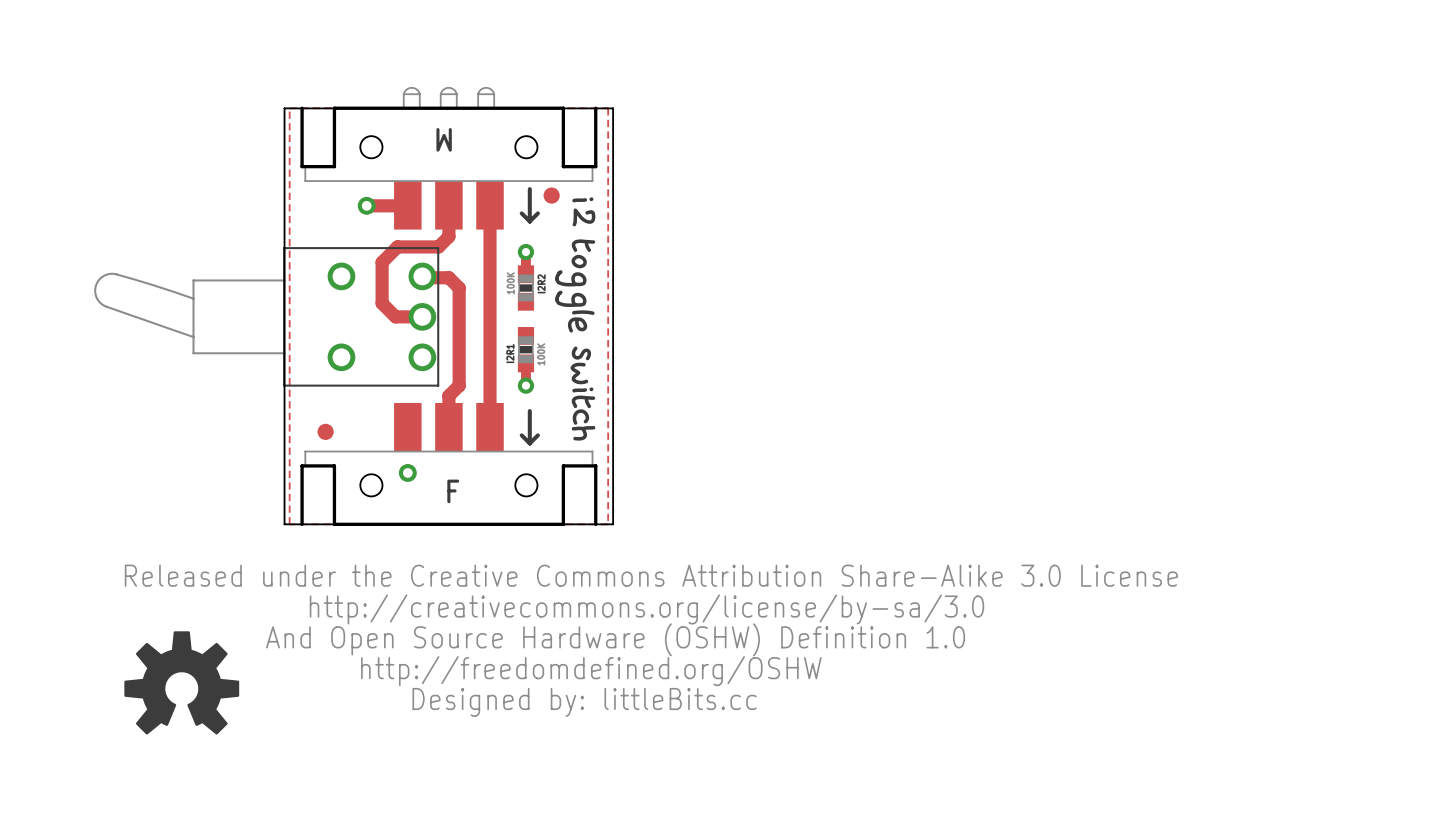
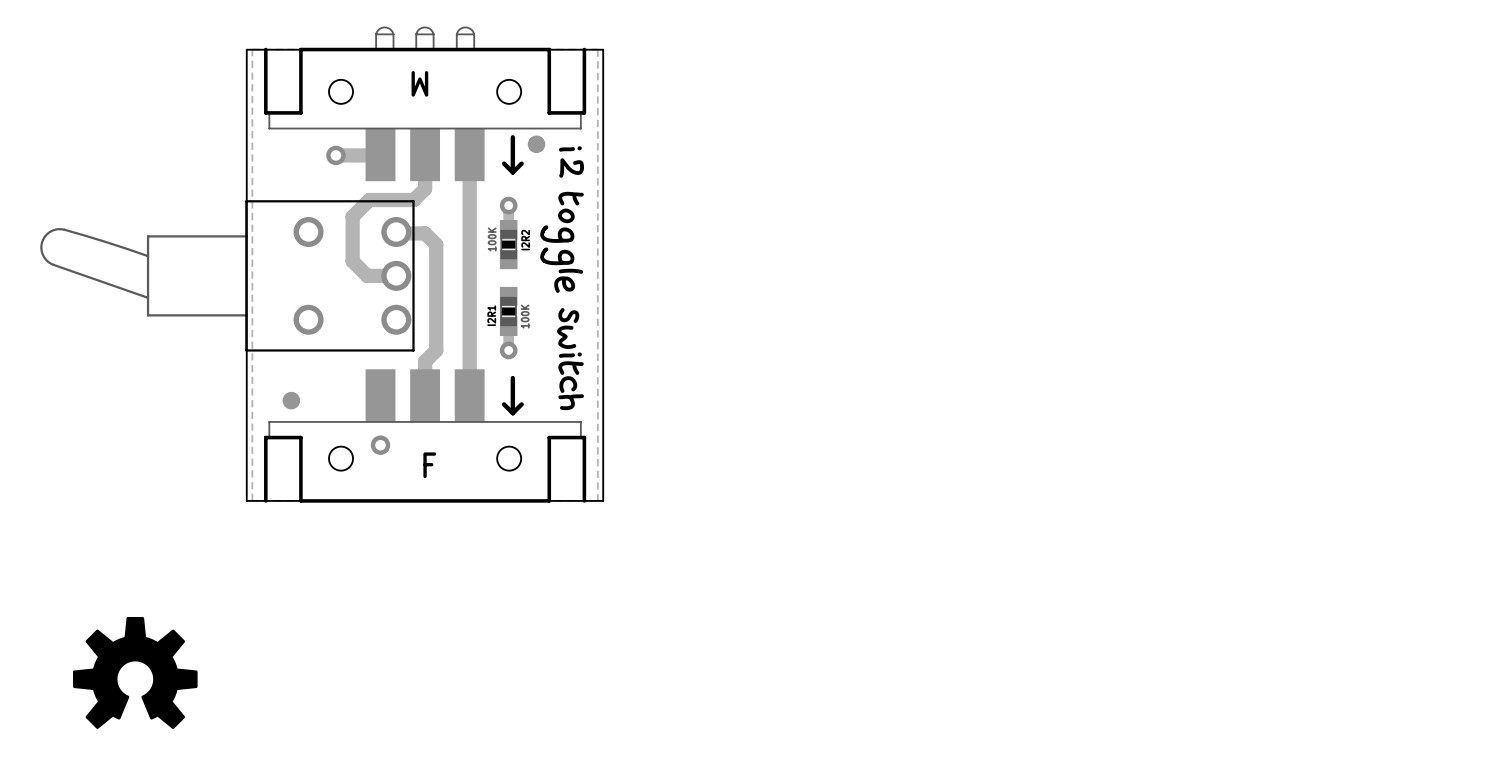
drawing: [124, 564, 1178, 717] -> none

